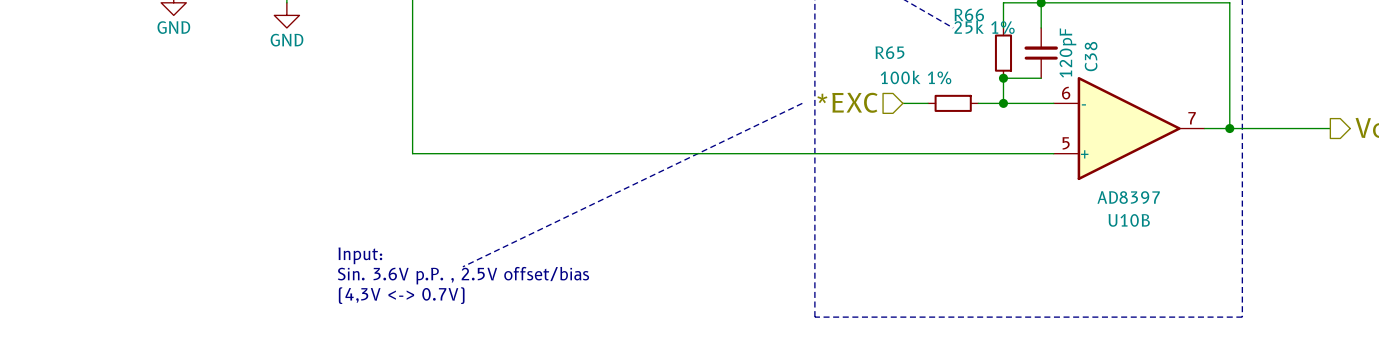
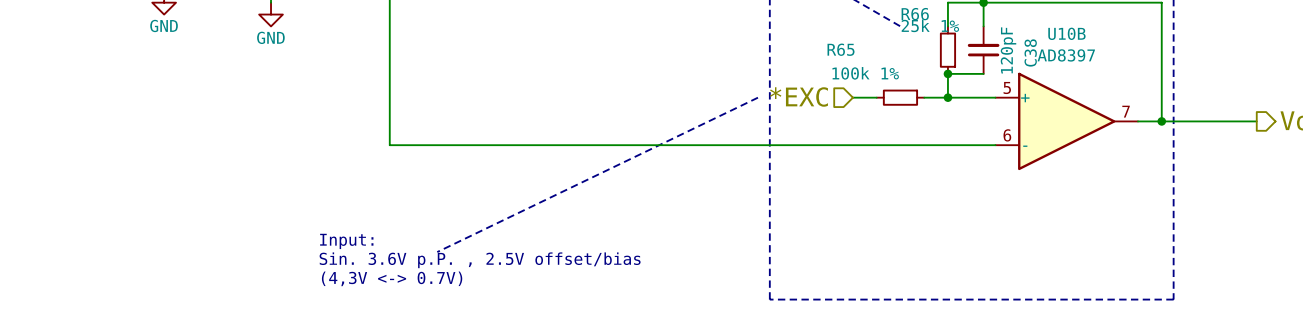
U10B flip: as is (1129, 128) -> up-down (1066, 121)

